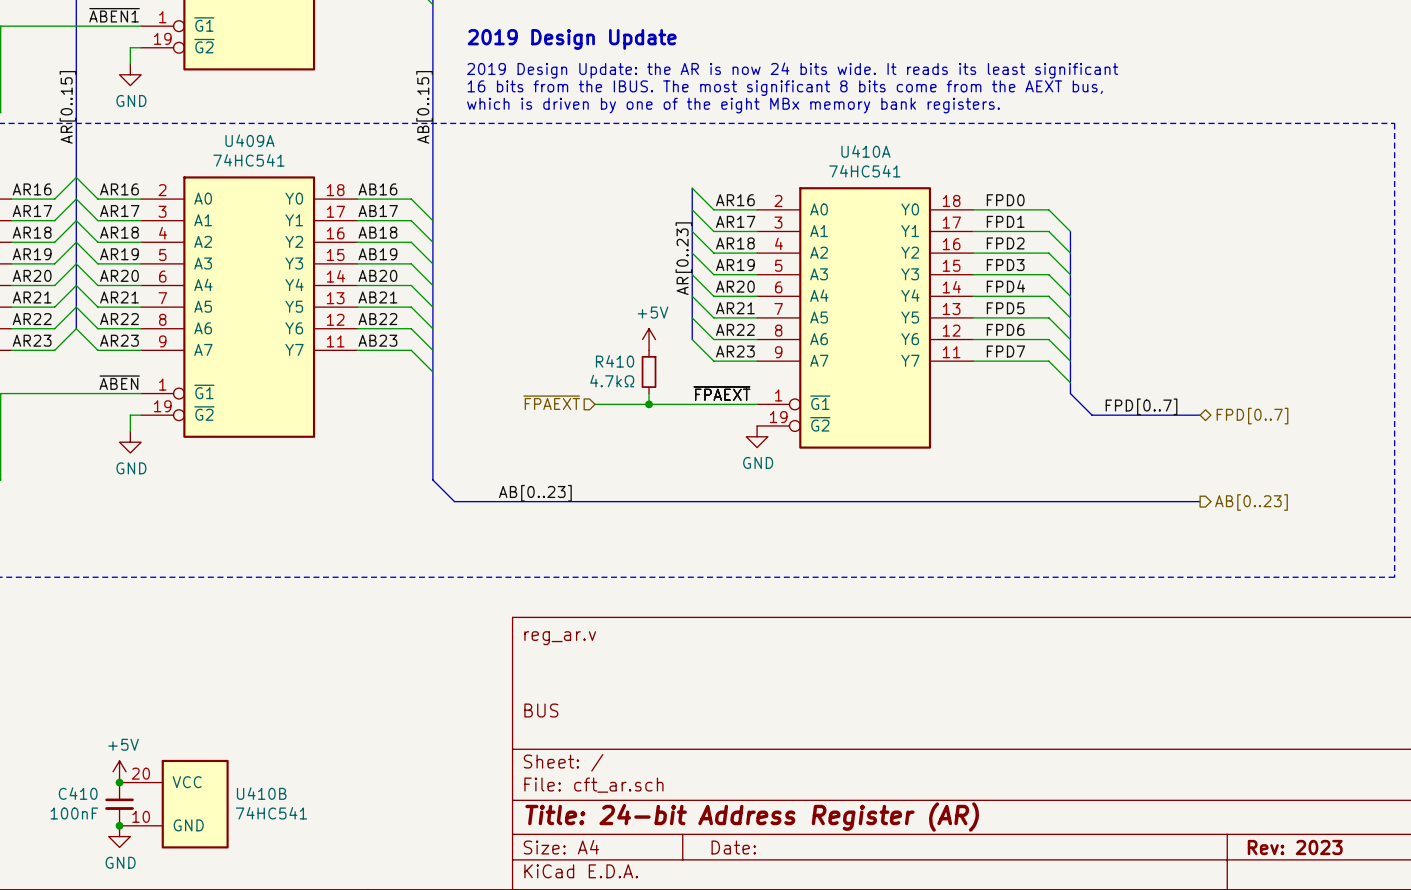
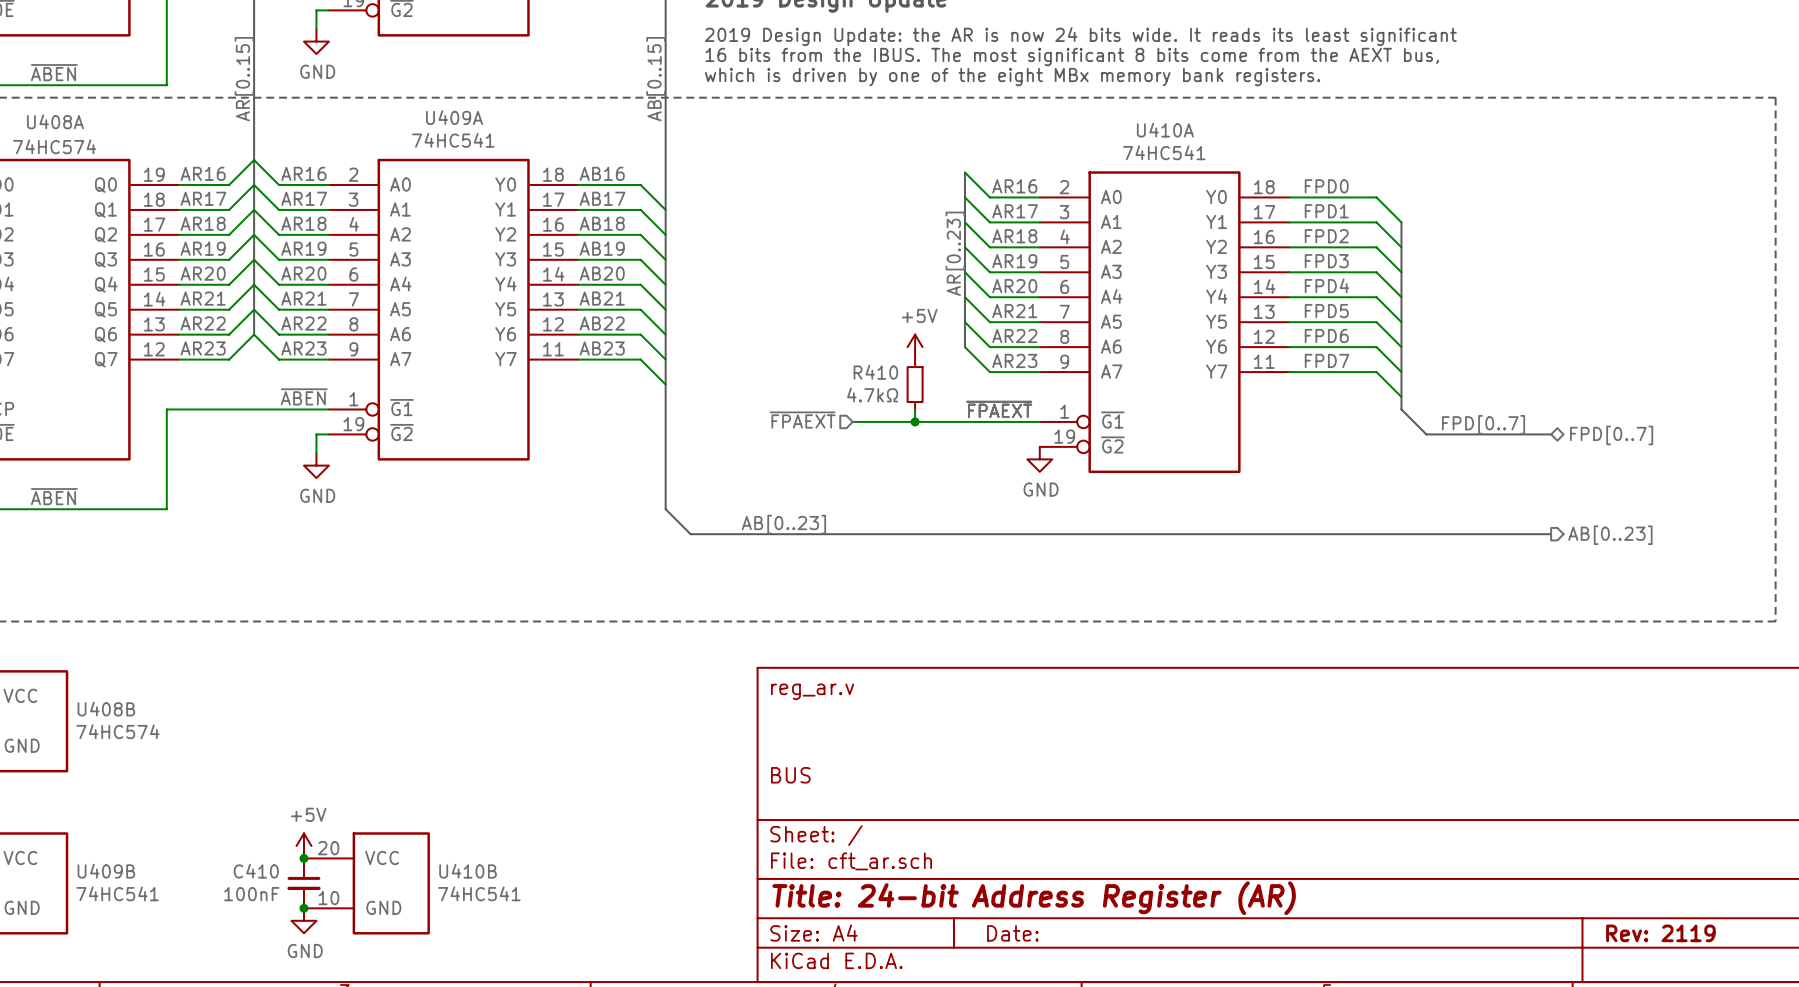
title block: Rev: 2023 (1295, 847) -> Rev: 2119 (1660, 933)

